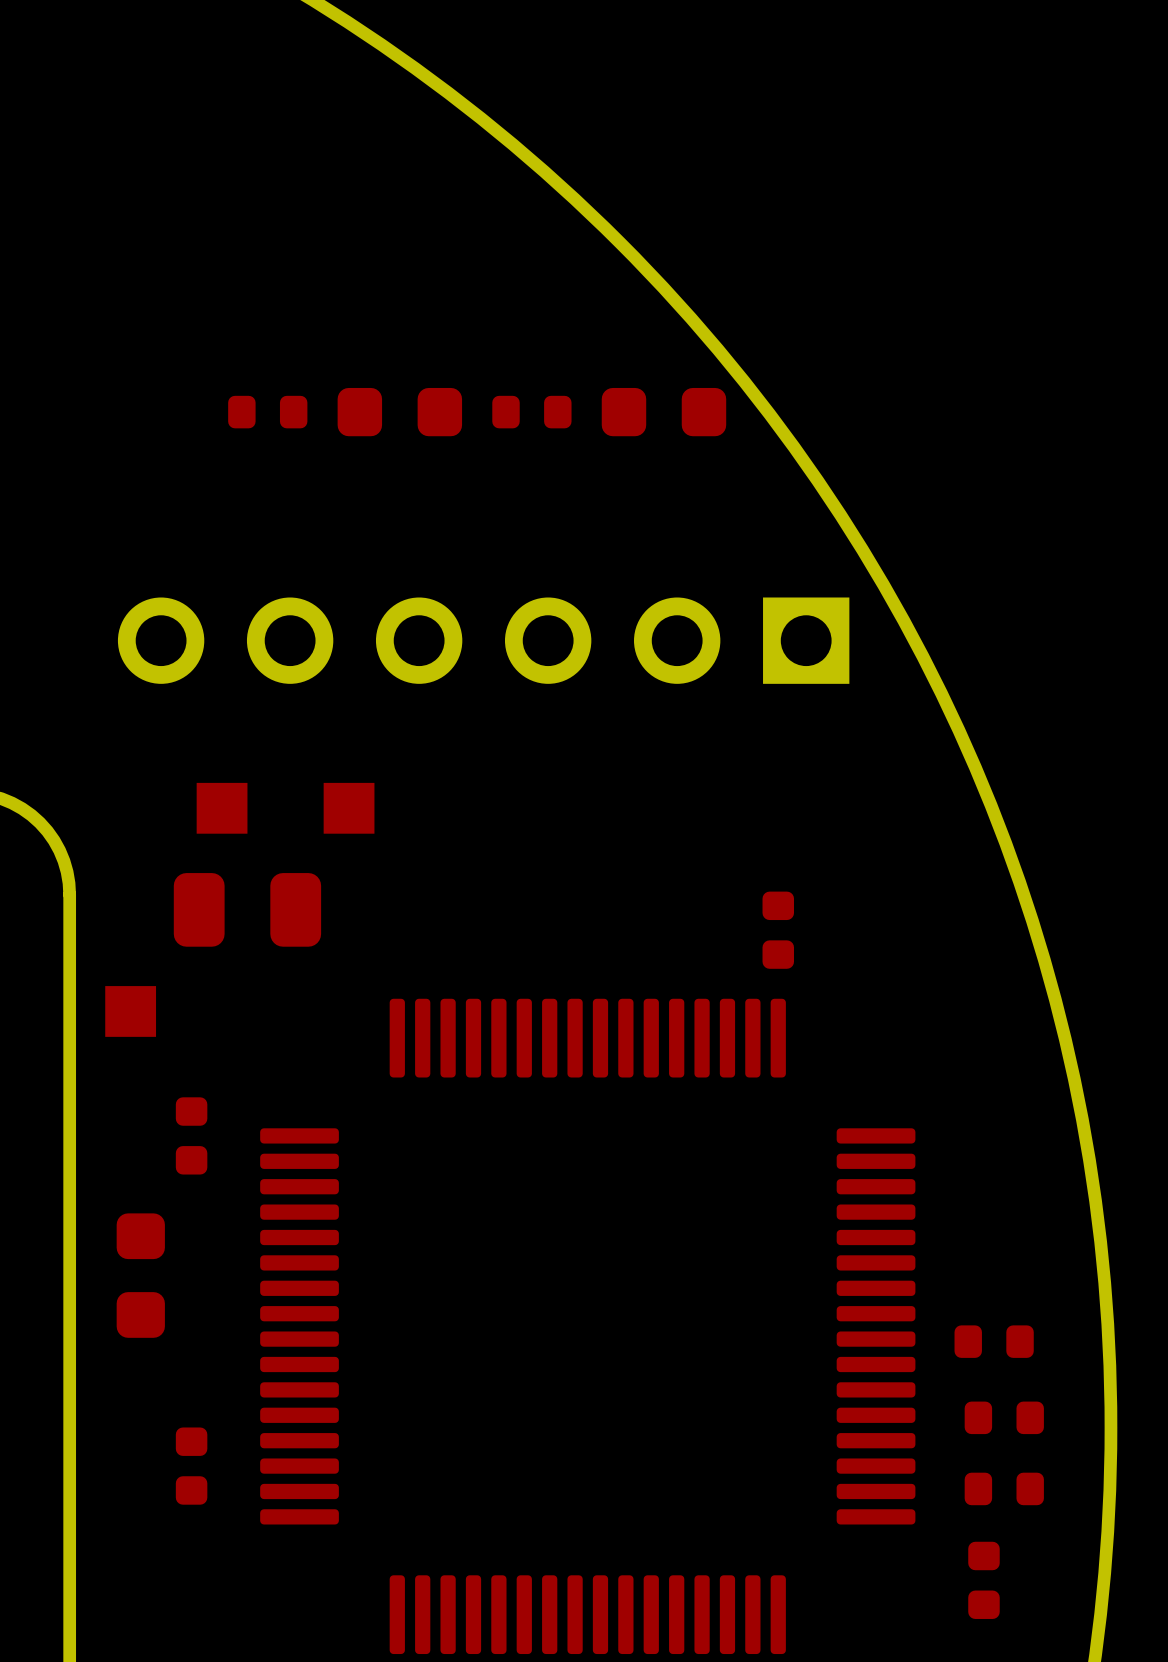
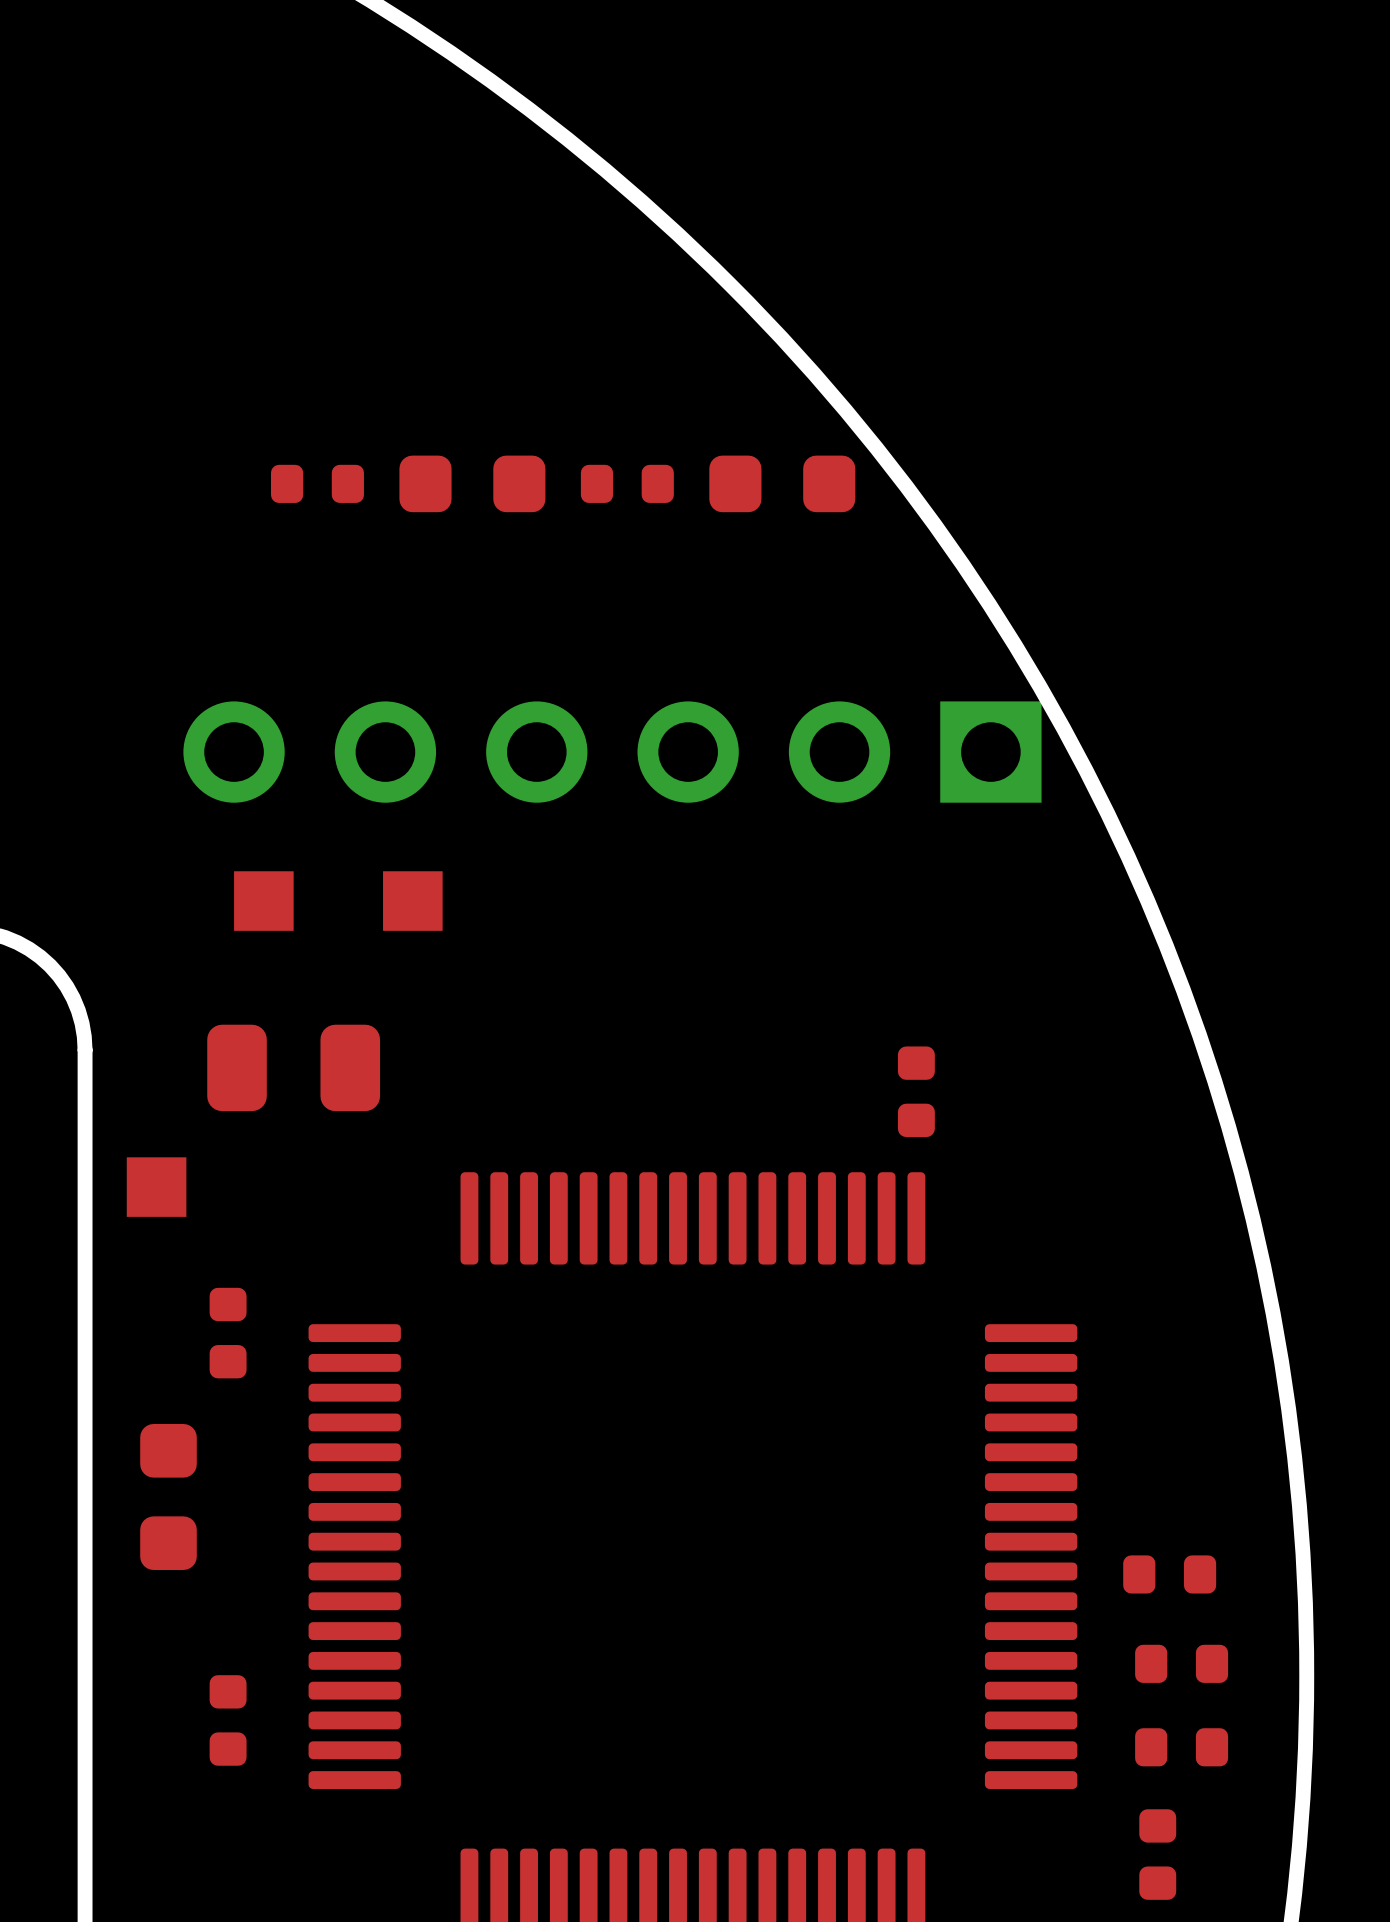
part position: (483, 640) -> (612, 752)
part position: (222, 808) -> (263, 901)
part position: (349, 808) -> (412, 901)

